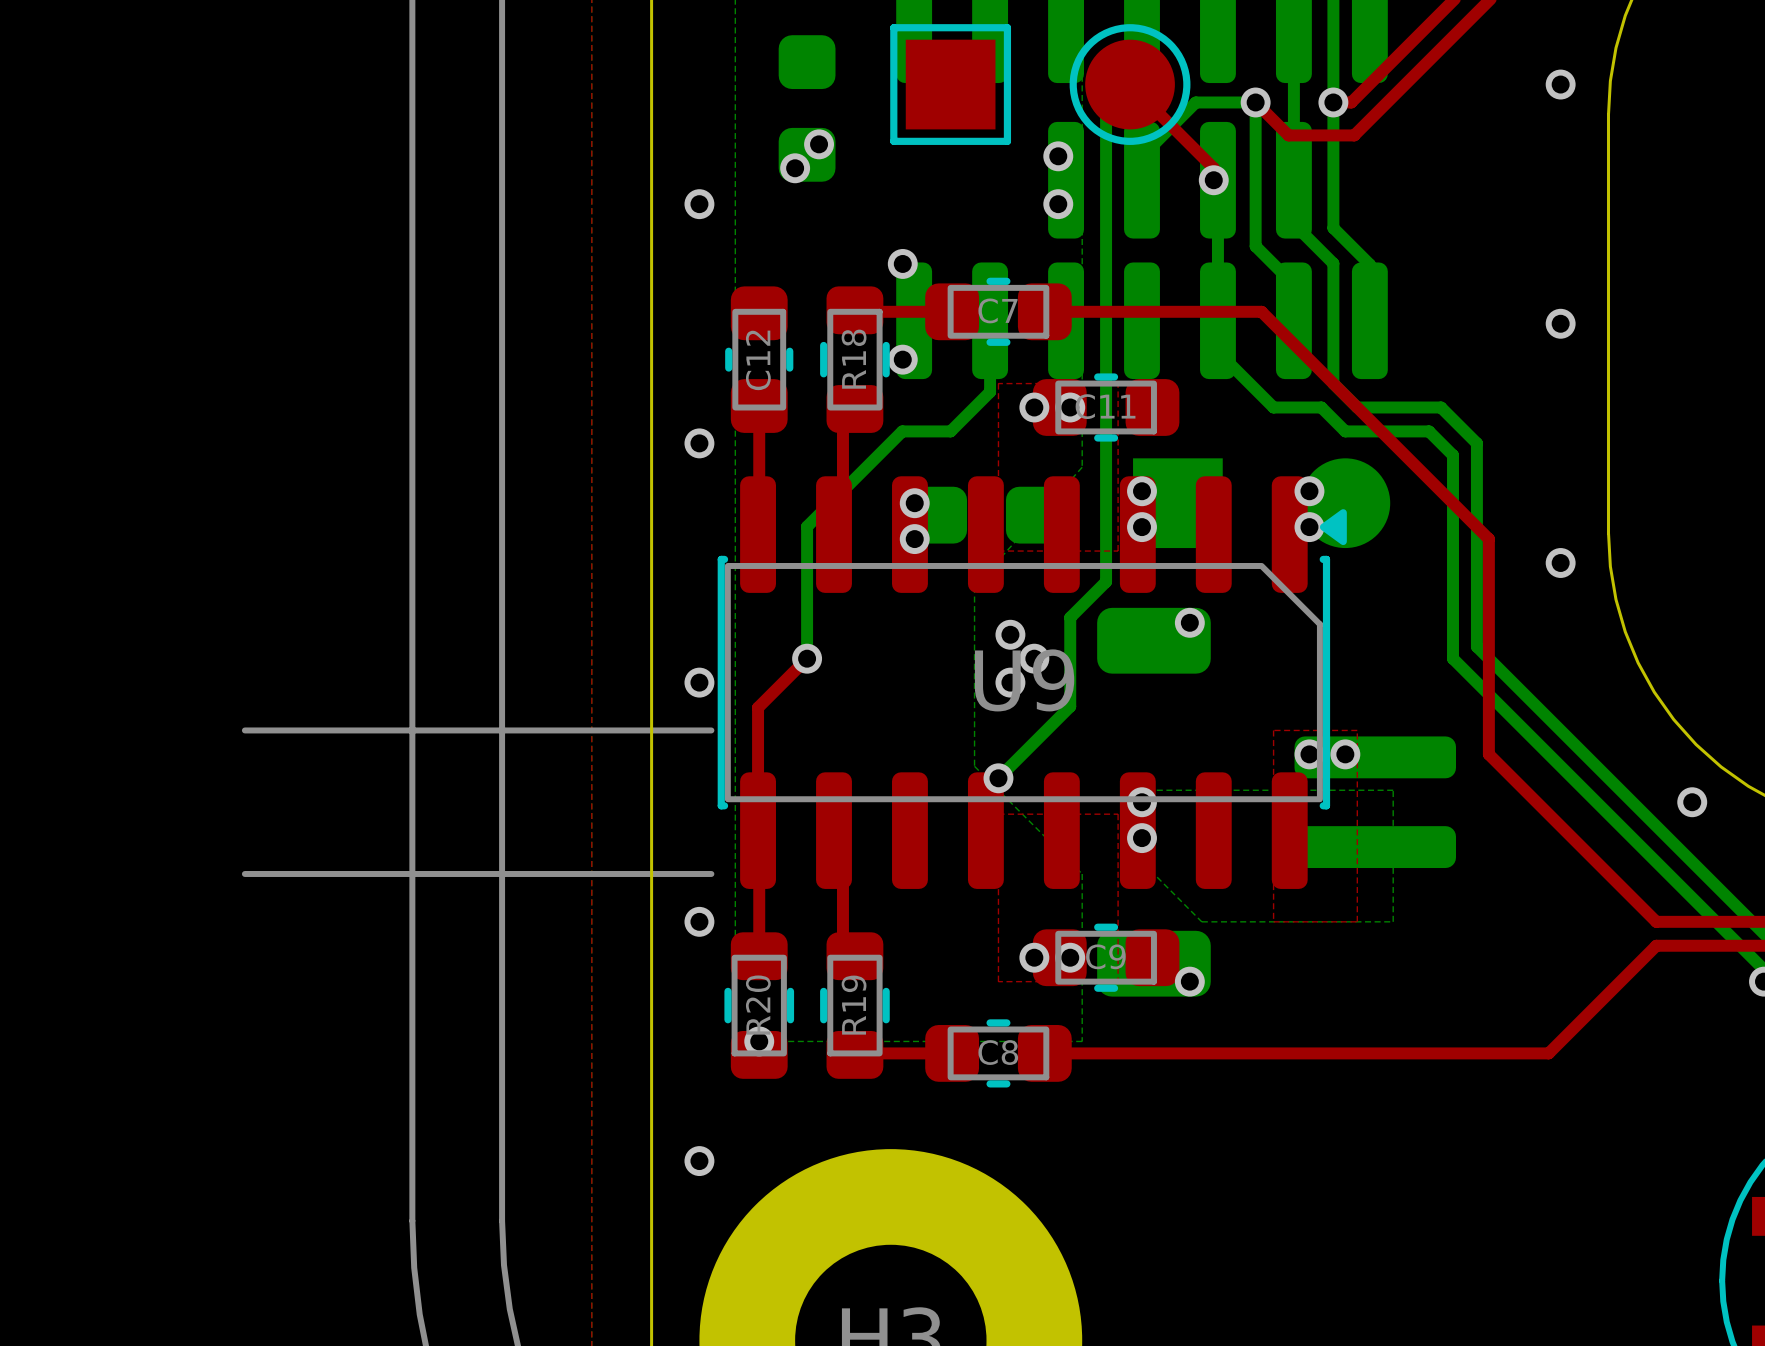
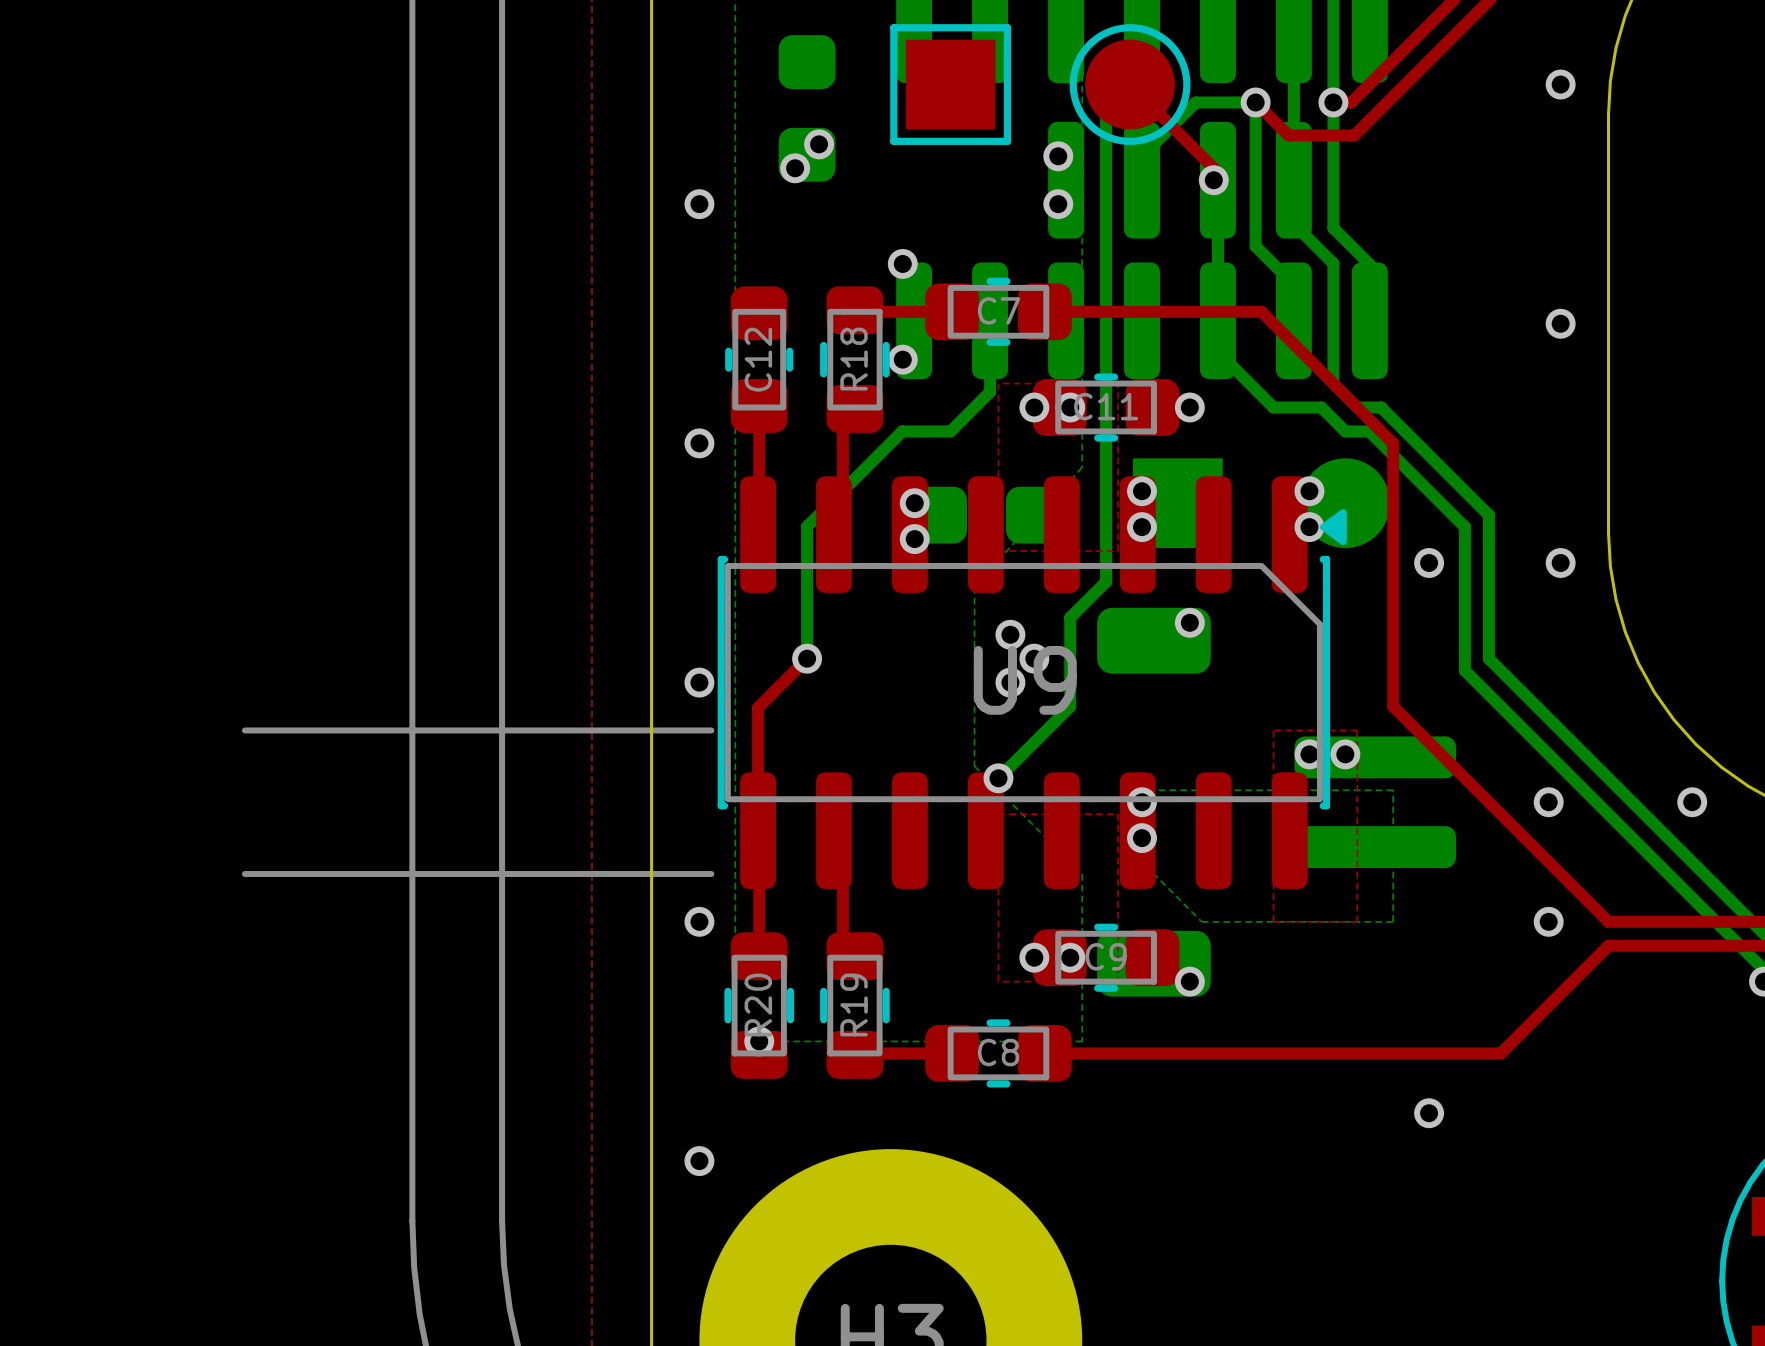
via: none -> (1189, 407)
bottom track: (1381, 407) (1441, 407) (1476, 443) (1476, 646) (1488, 658) -> (1381, 407) (1488, 515) (1488, 658)
bottom track: (1369, 431) (1429, 431) (1453, 455) (1453, 658) (1464, 670) -> (1369, 431) (1464, 527) (1464, 670)
top track: (1393, 443) (1488, 539) (1488, 754) (1656, 921) -> (1393, 443) (1393, 706) (1608, 921) (1656, 921)
via: none -> (1429, 562)
via: none -> (1548, 802)
via: none -> (1548, 921)
top track: (1656, 945) (1548, 1053) (1500, 1053) -> (1656, 945) (1608, 945) (1500, 1053)
via: none -> (1429, 1113)

